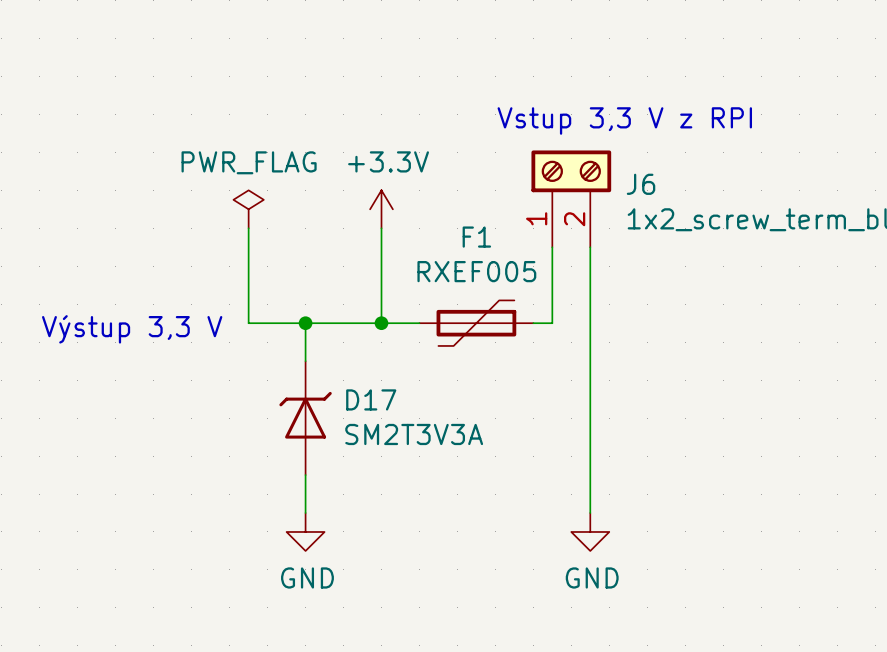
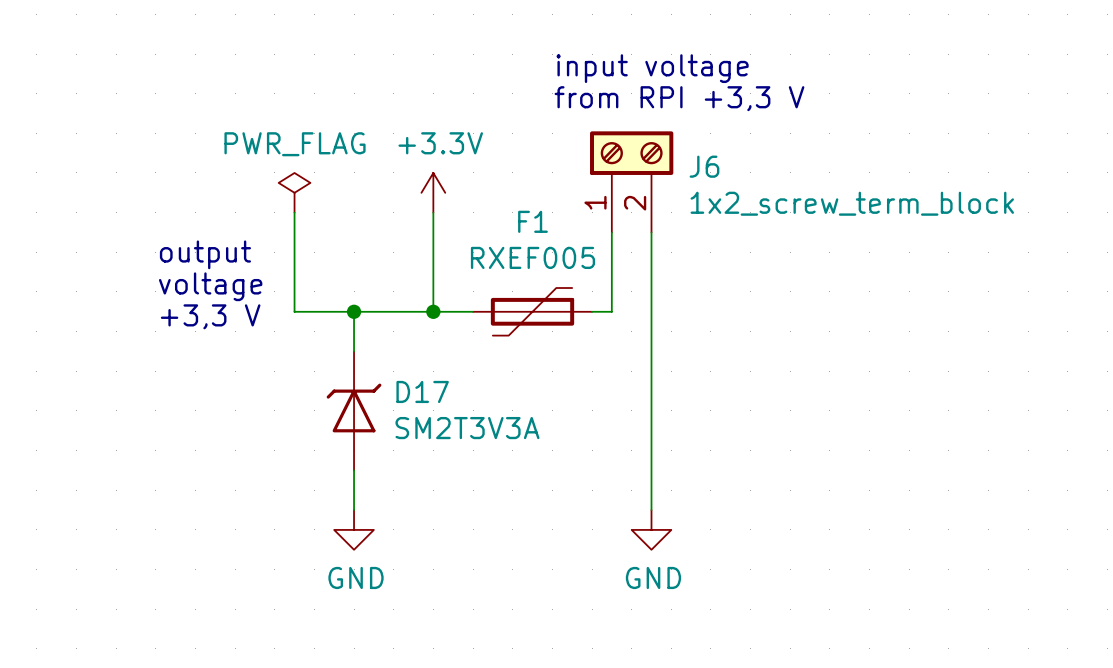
text: none -> input voltage (652, 68)
text: Vstup 3,3 V z RPI (624, 120) -> from RPI +3,3 V (679, 98)
text: none -> output (205, 254)
text: none -> voltage (210, 286)
text: none -> +3,3 V (210, 316)
text: Výstup 3,3 V (132, 329) -> none

